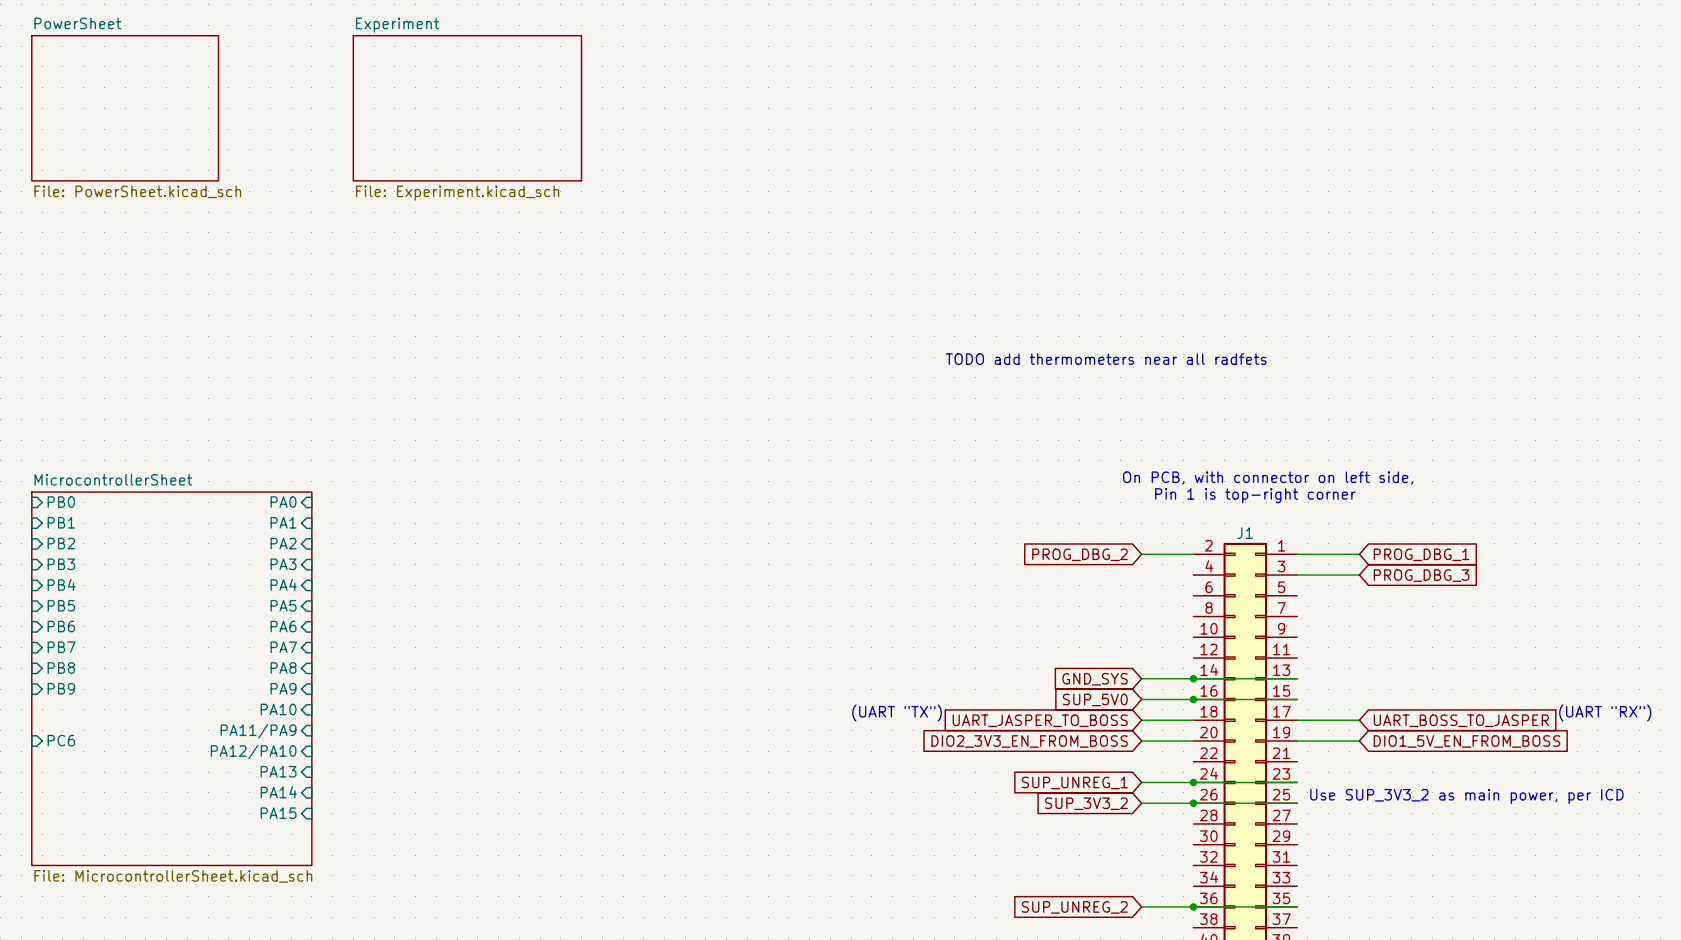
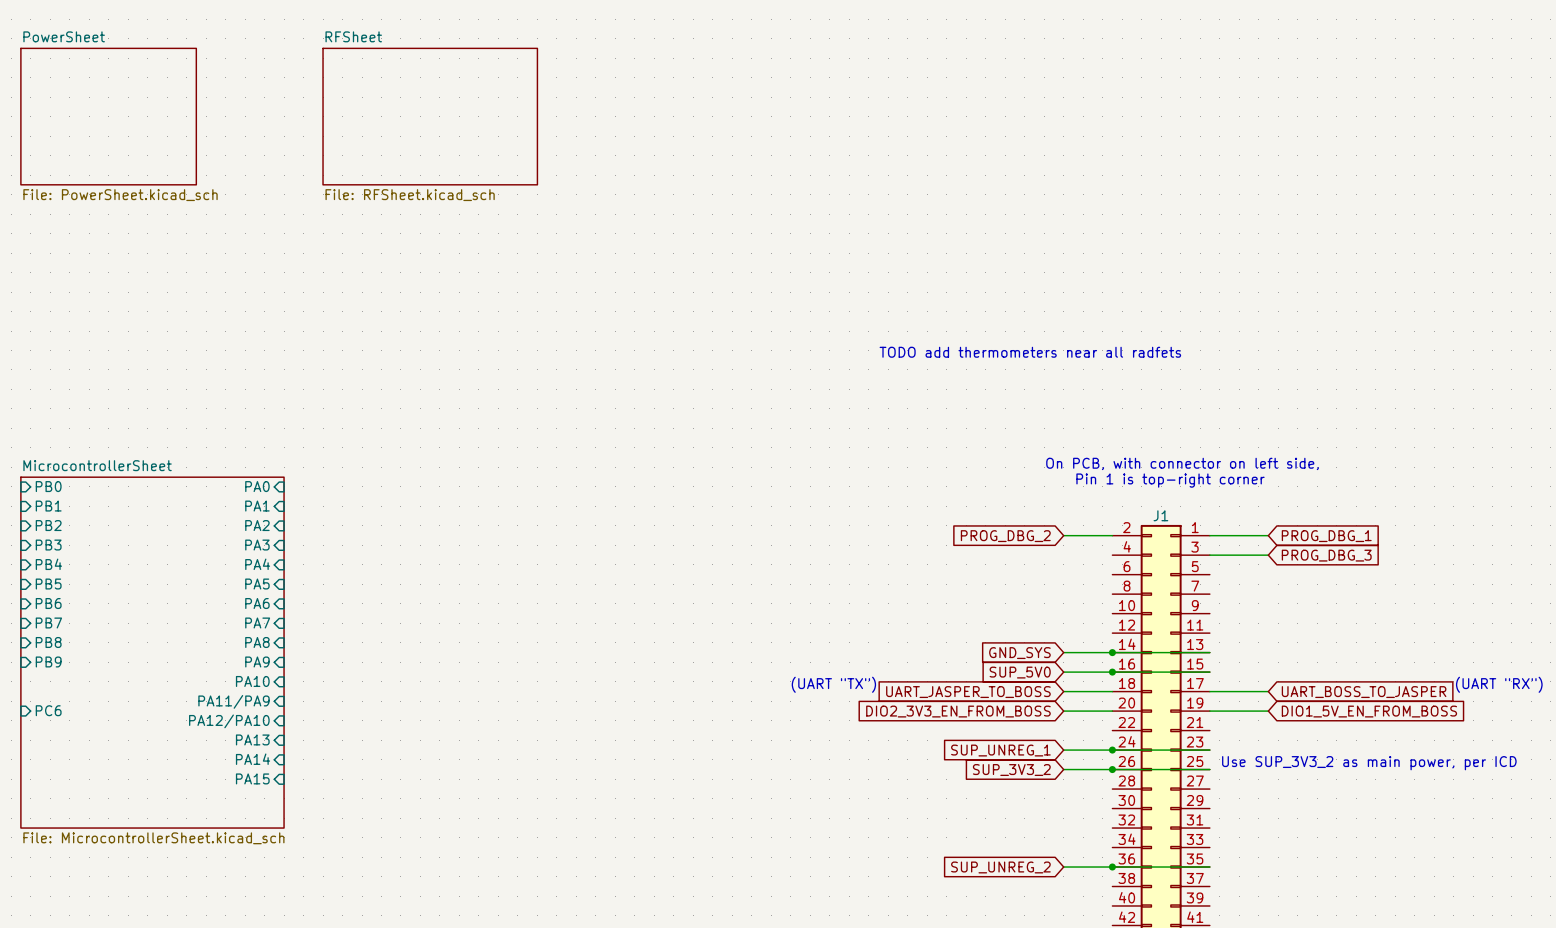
sheet Experiment name: Experiment (397, 25) -> RFSheet (353, 36)
sheet Experiment value: File: Experiment.kicad_sch (457, 193) -> File: RFSheet.kicad_sch (410, 195)

